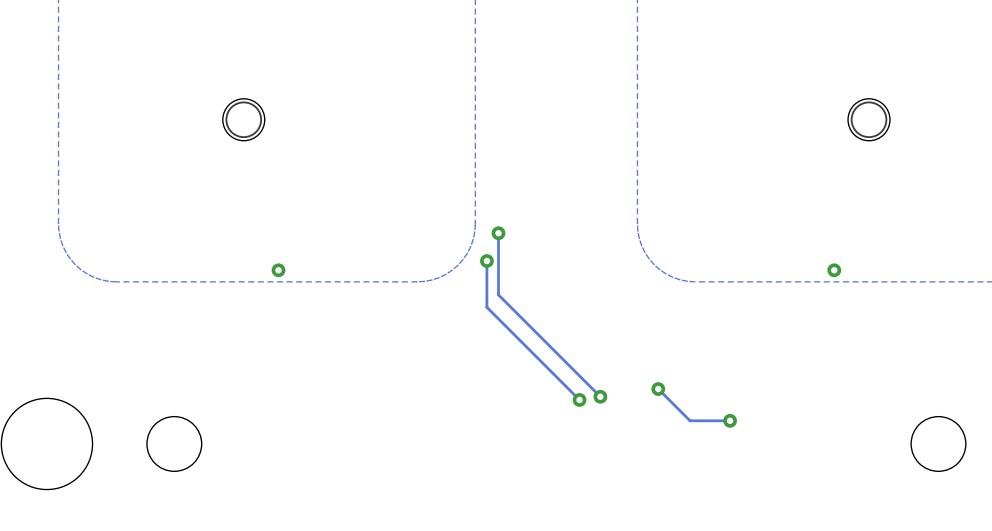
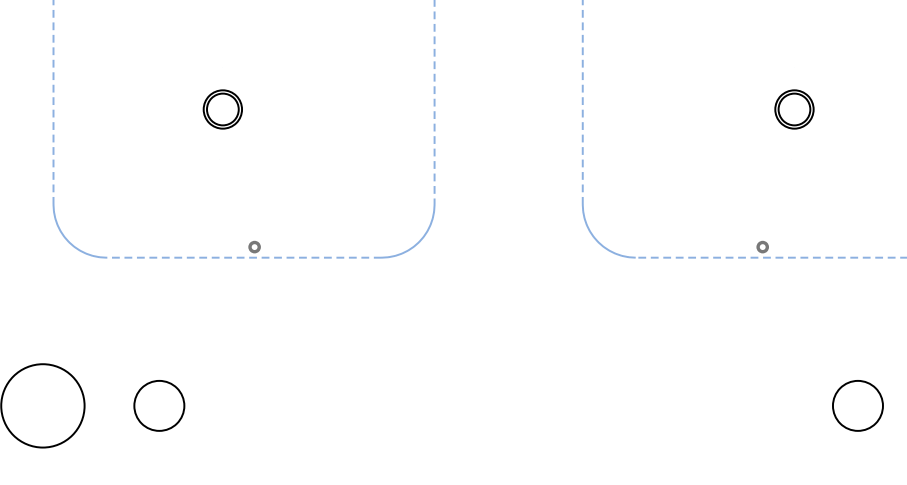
track: (498, 233) (498, 294) (600, 396) -> none
via: (498, 233) -> none
track: (486, 261) (486, 307) (579, 399) -> none
via: (486, 261) -> none
track: (658, 389) (690, 420) (730, 420) -> none
via: (658, 389) -> none
via: (600, 396) -> none
via: (579, 399) -> none
via: (730, 420) -> none

